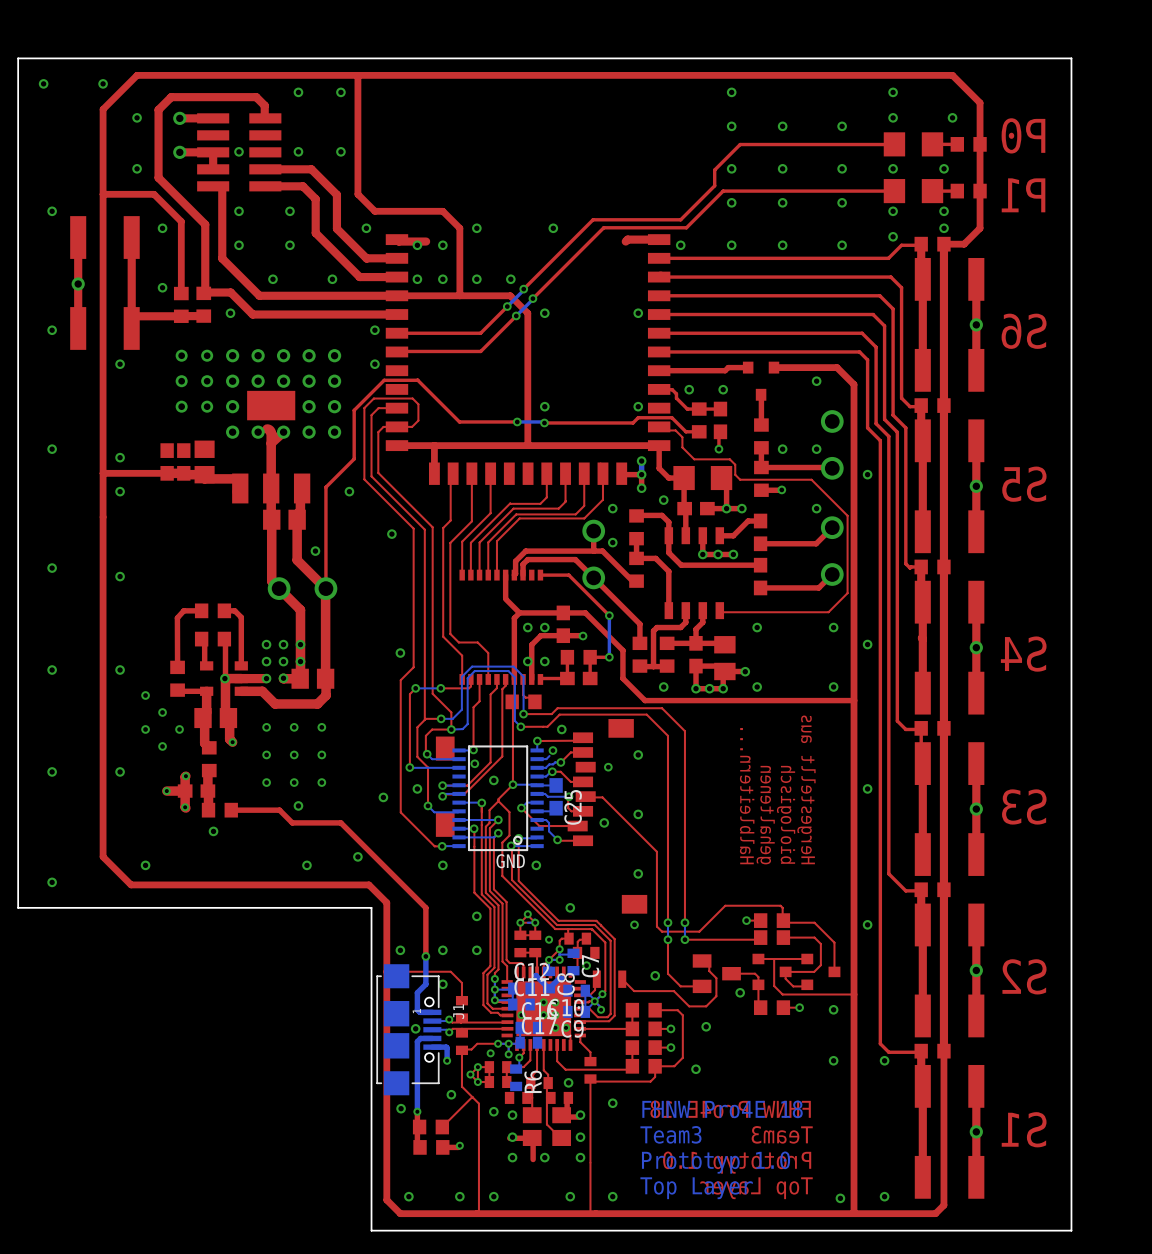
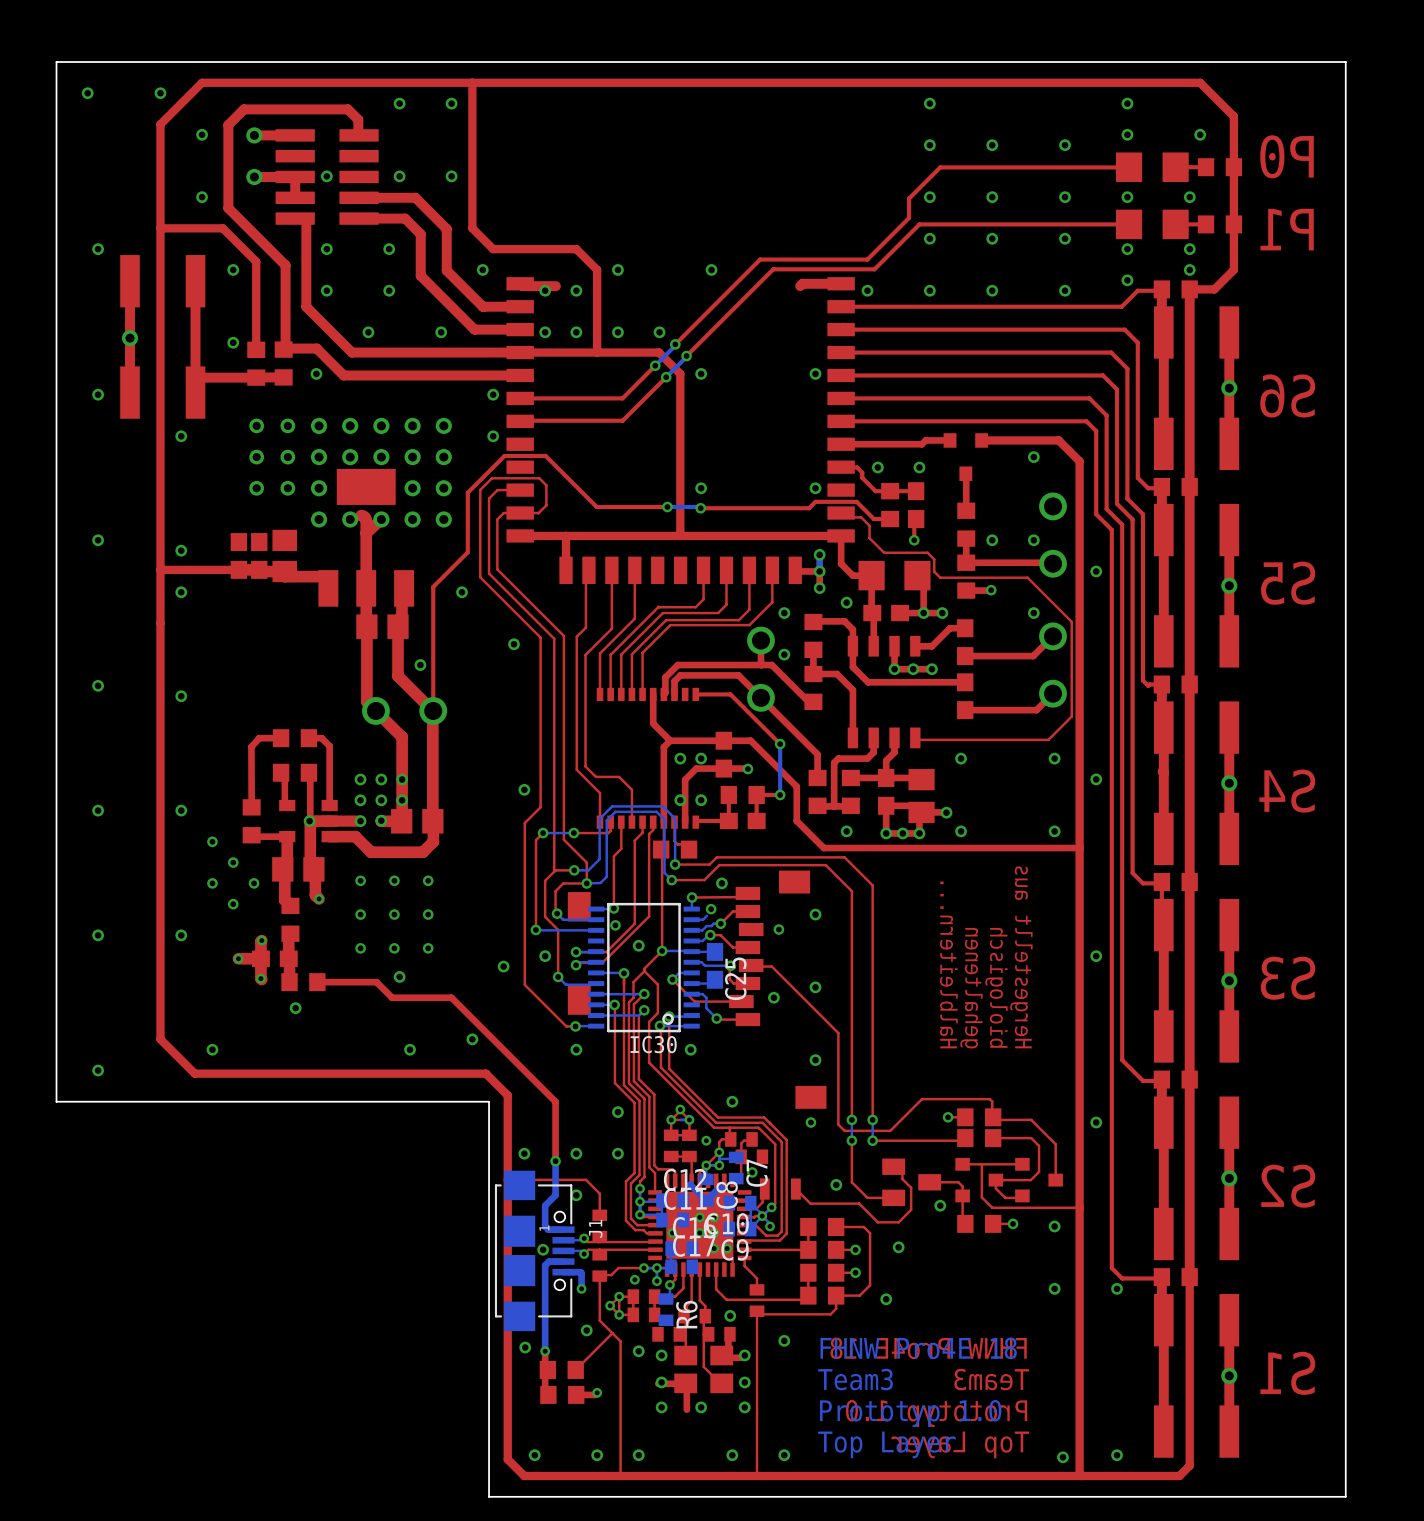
GND name: GND (510, 861) -> IC30 (653, 1044)

